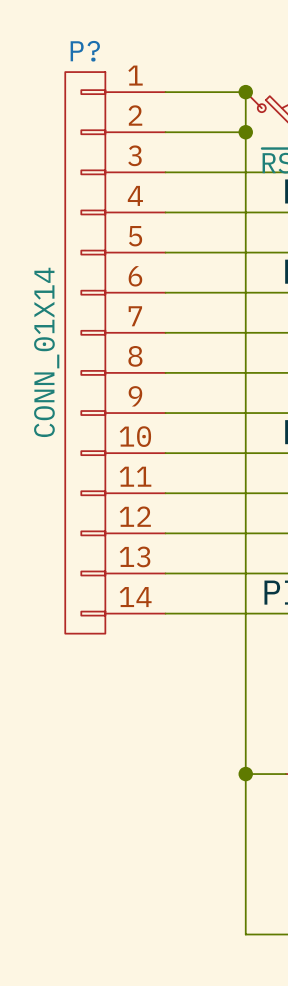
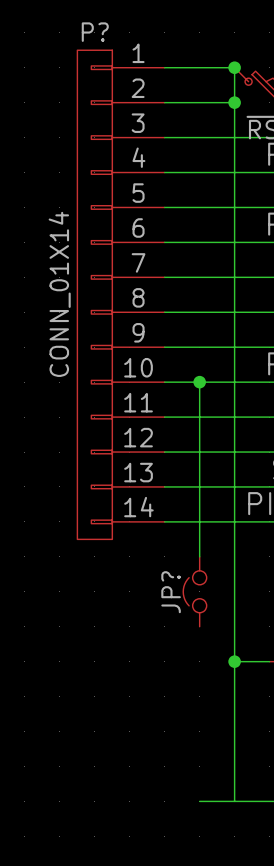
wire: none -> (199, 382) (199, 556)
junction: none -> (199, 382)
JP?: none -> (194, 591)
wire: none -> (199, 801) (234, 801)

